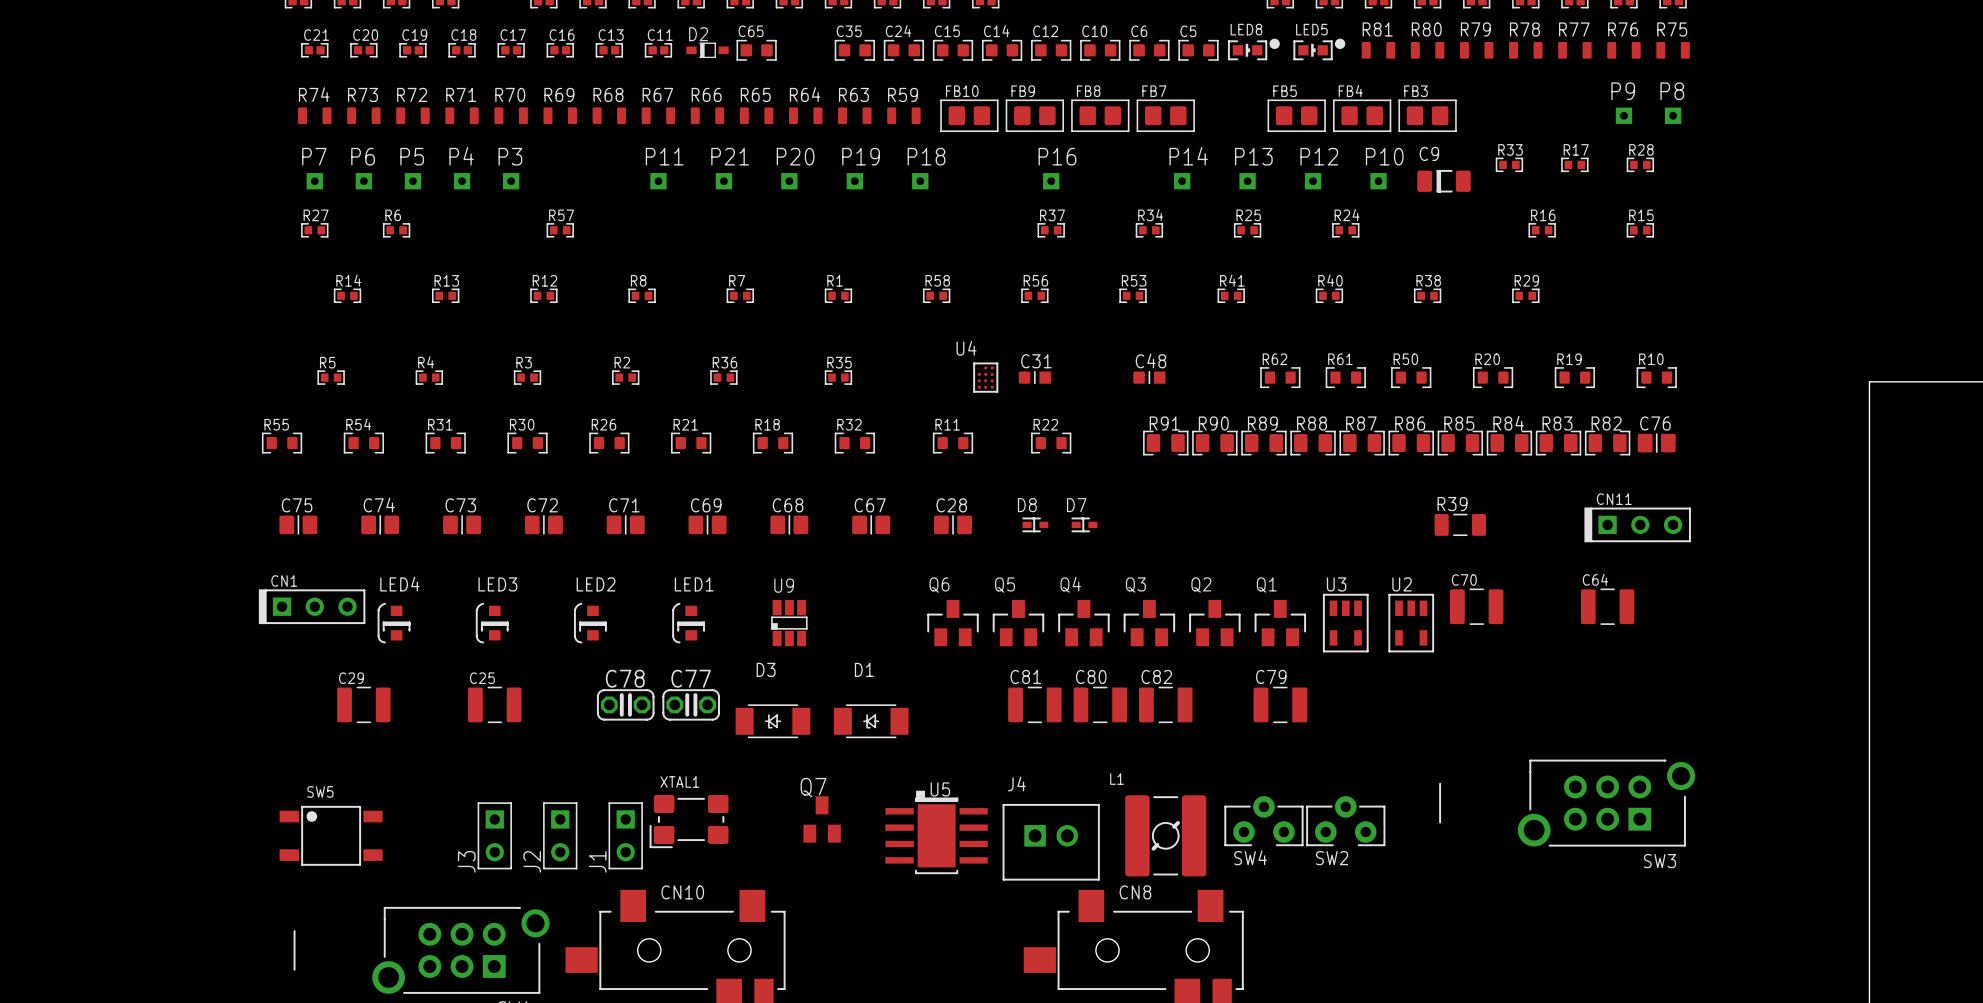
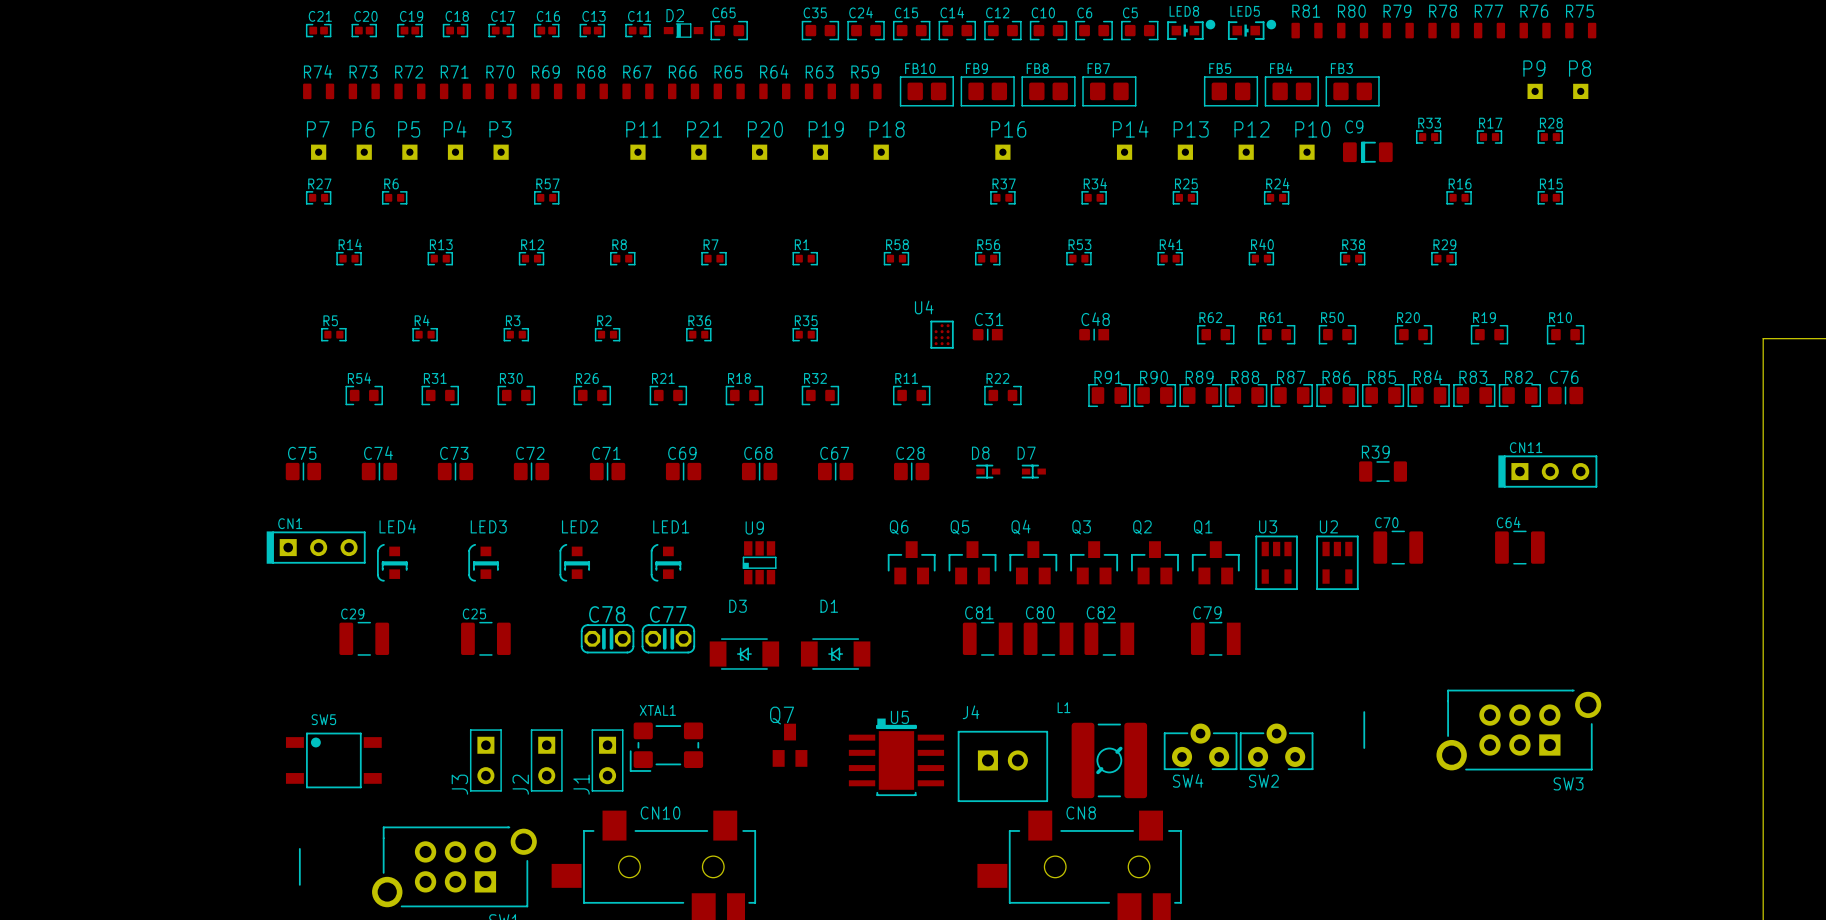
R55: (282, 443) -> none

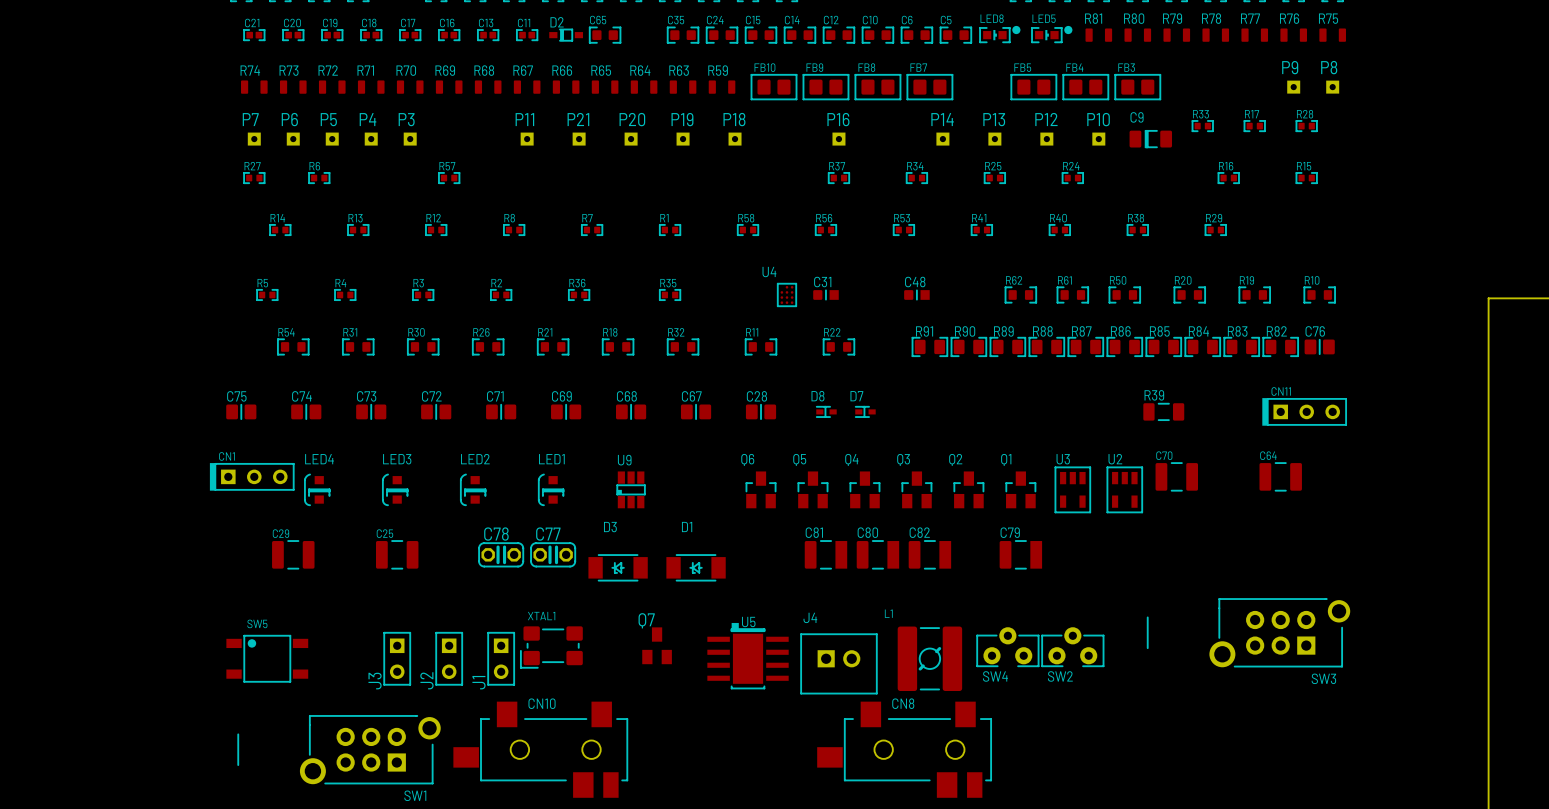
Q6 footprint: [887, 541, 936, 585] -> [745, 471, 777, 509]
Q5 footprint: [948, 541, 997, 585] -> [797, 471, 829, 509]
Q4 footprint: [1009, 541, 1058, 585] -> [849, 471, 881, 509]
Q3 footprint: [1070, 541, 1119, 585] -> [901, 471, 933, 509]
Q2 footprint: [1131, 541, 1179, 585] -> [953, 471, 985, 509]
Q1 footprint: [1191, 541, 1240, 585] -> [1005, 471, 1037, 509]

